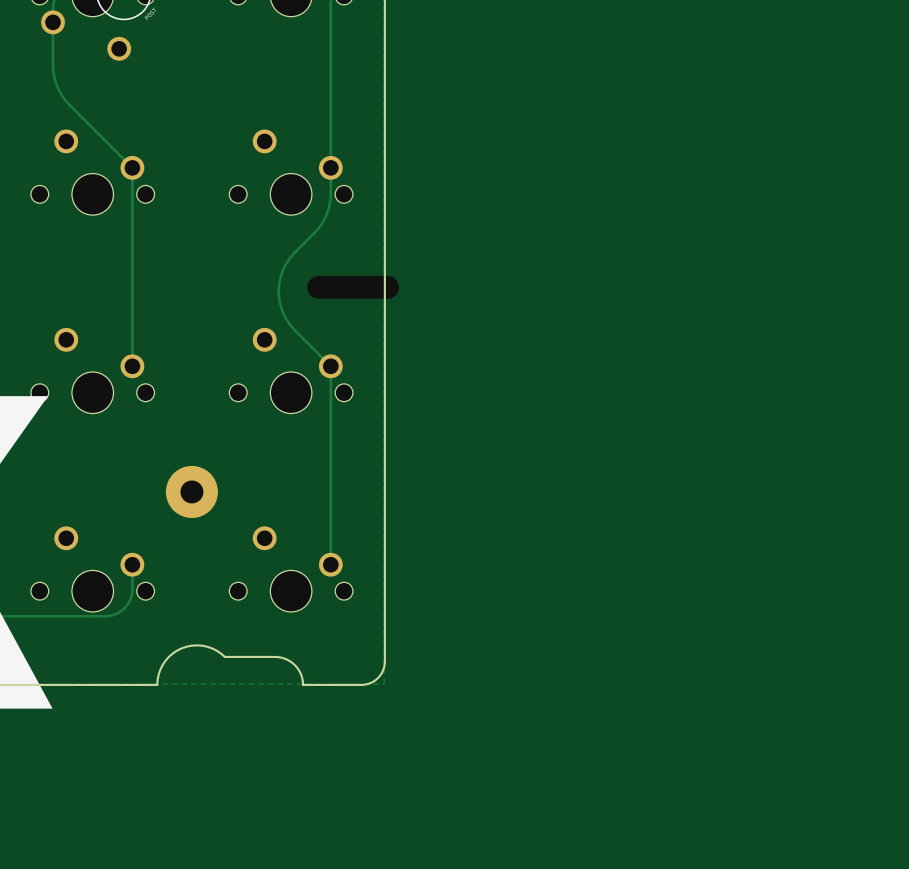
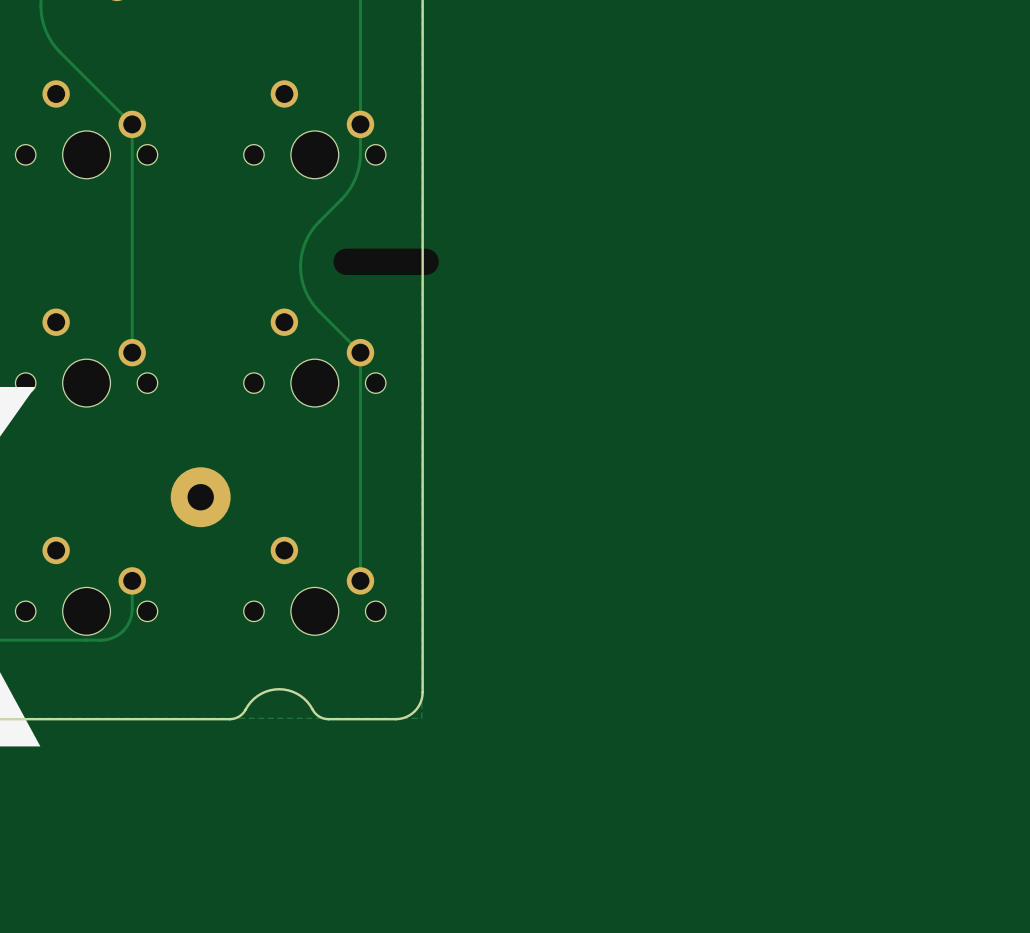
board edge: (274, 656) (224, 656) (207, 646) (186, 646) (172, 653) (165, 660) (160, 669) (157, 684) -> (328, 719) (317, 715) (307, 702) (296, 693) (279, 689) (270, 690) (257, 695) (242, 714) (233, 718) (160, 719)
board edge: (275, 656) (284, 658) (294, 665) (301, 675) (303, 684) -> none

